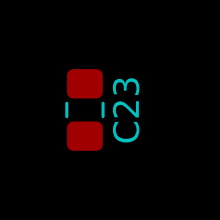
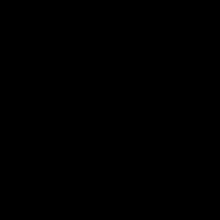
C23: (84, 109) -> none

